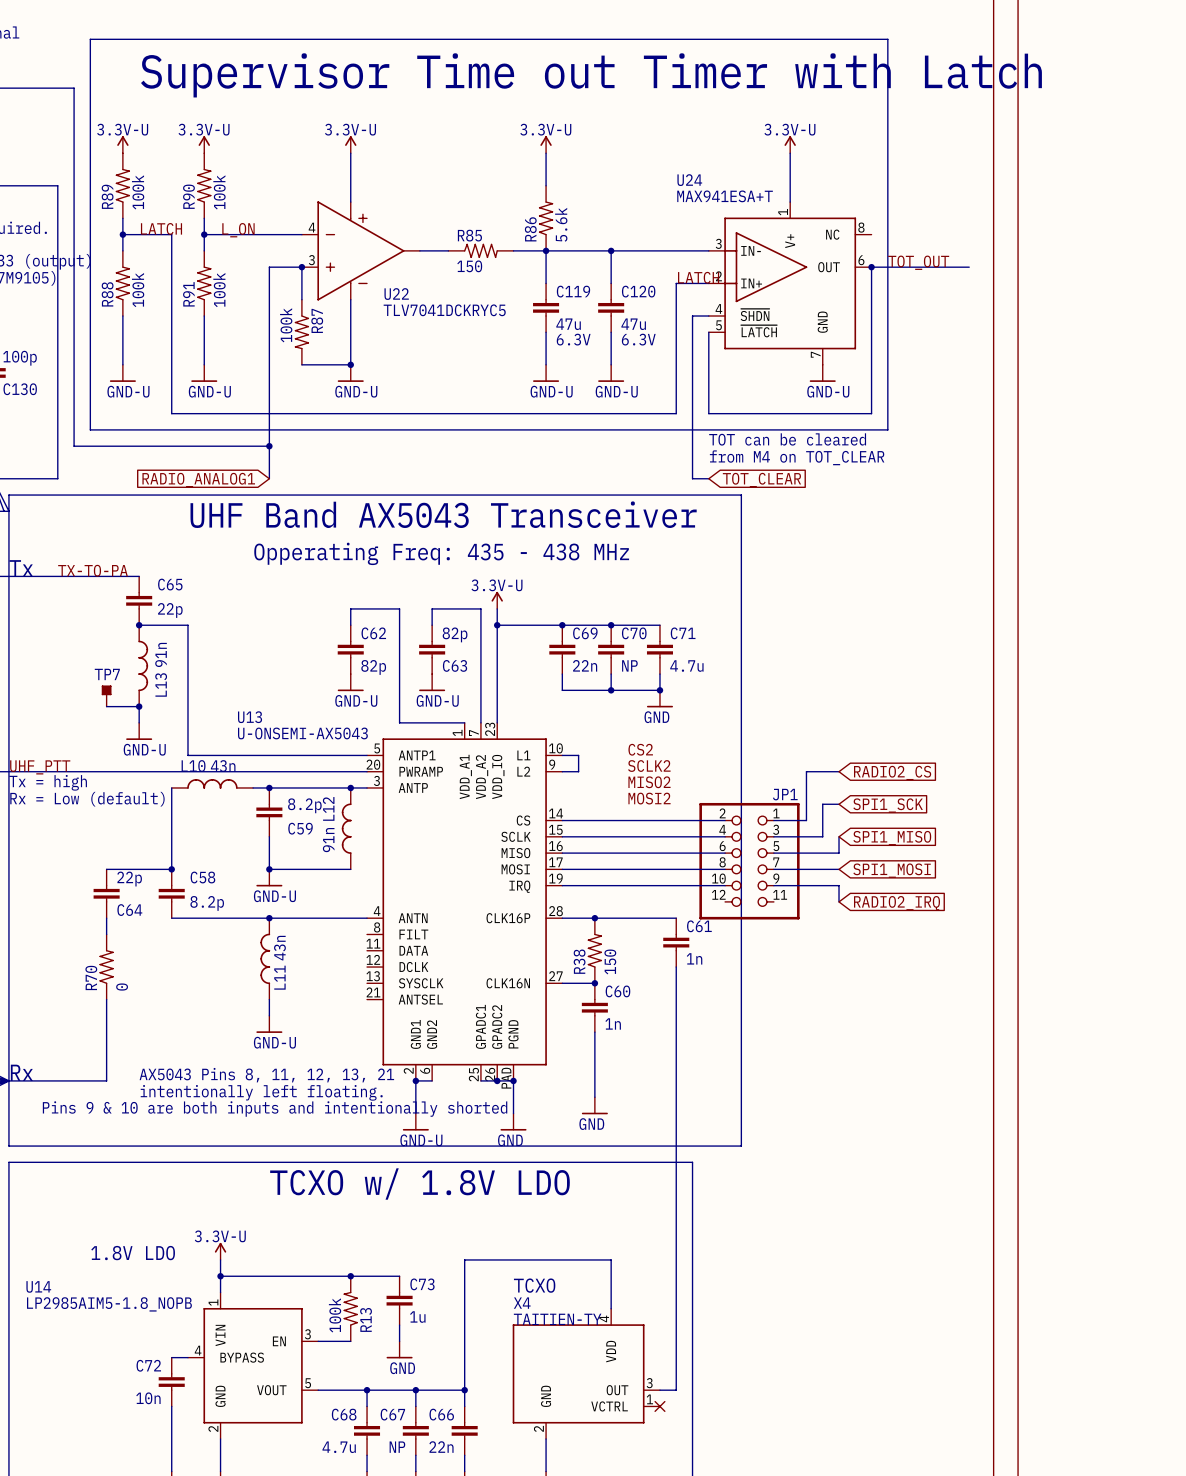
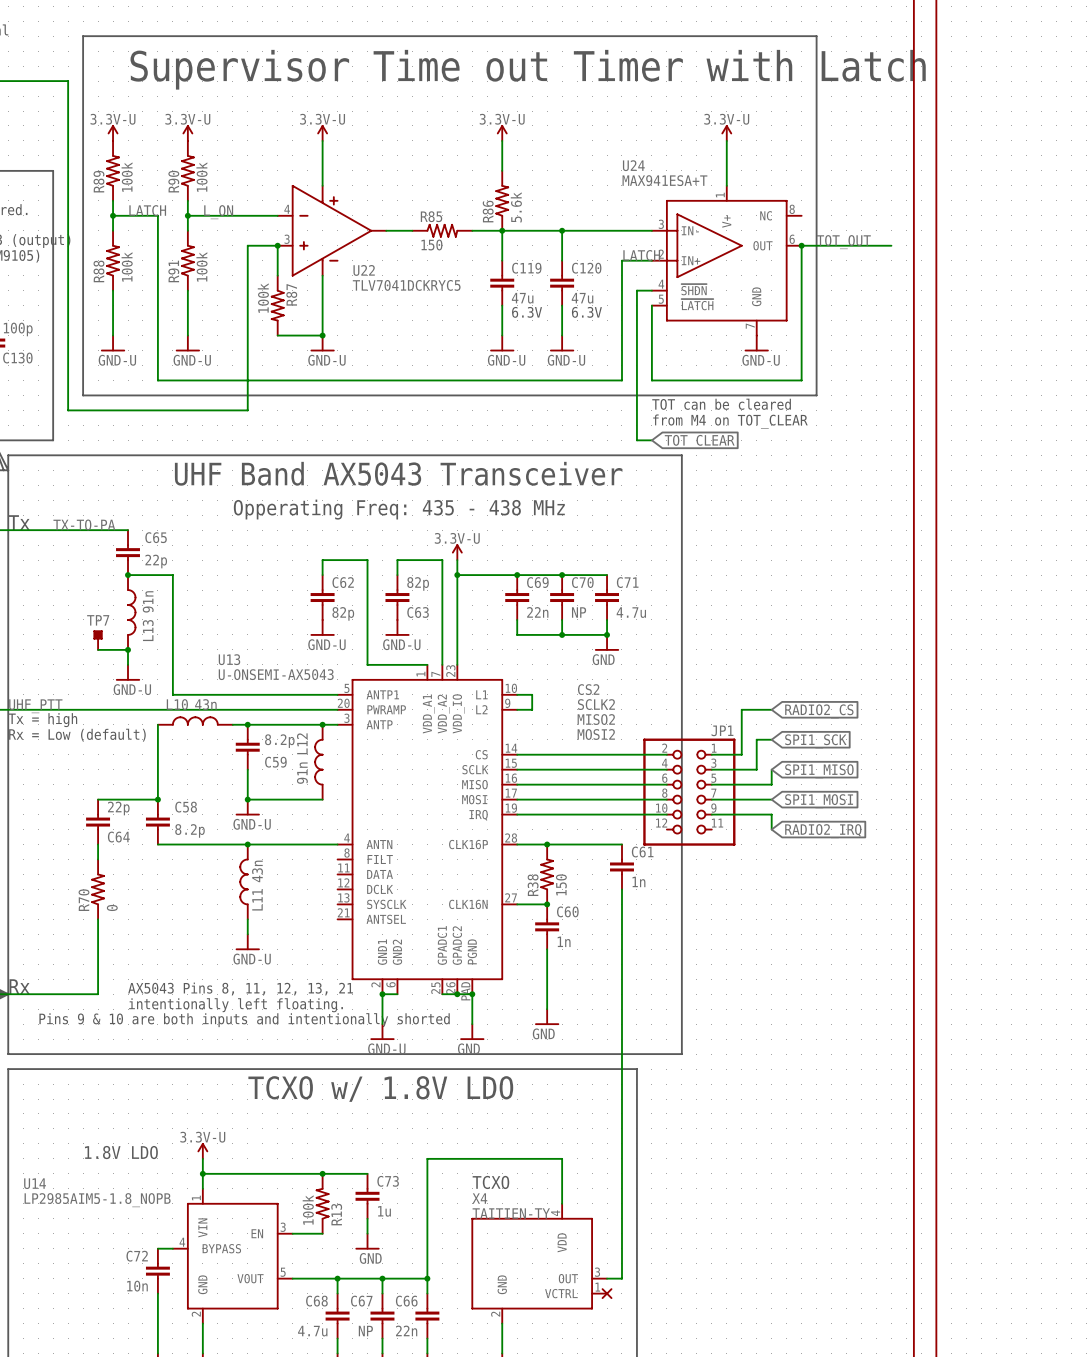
wire: (269, 446) (269, 478) -> none
junction: (269, 446) -> none
global label: RADIO_ANALOG1 (198, 480) -> none

